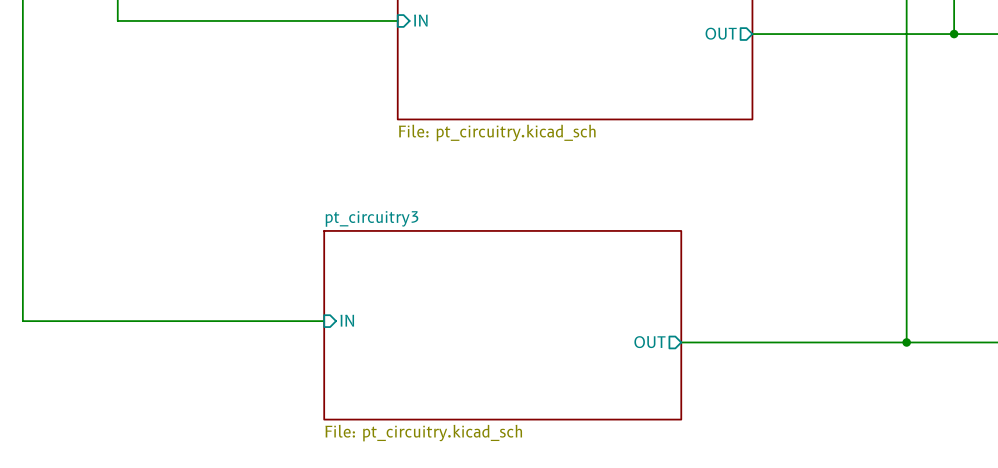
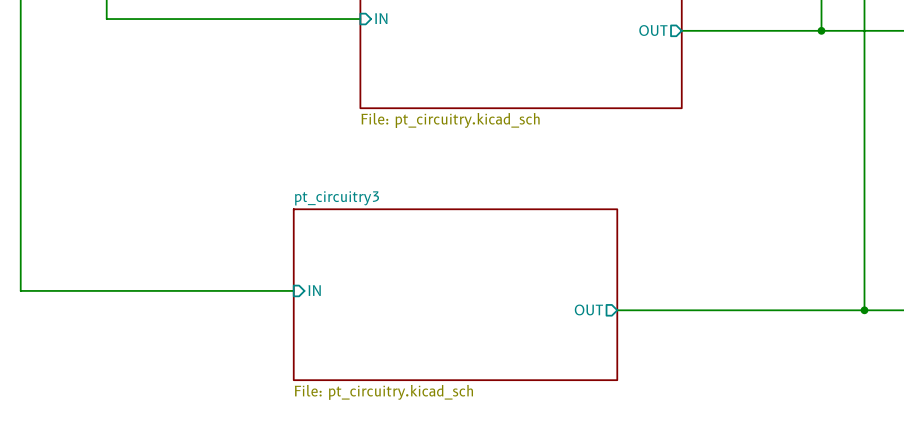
wire: (906, 34) (906, 342) -> (864, 30) (864, 310)
junction position: (954, 34) -> (821, 30)
junction position: (906, 342) -> (864, 310)

